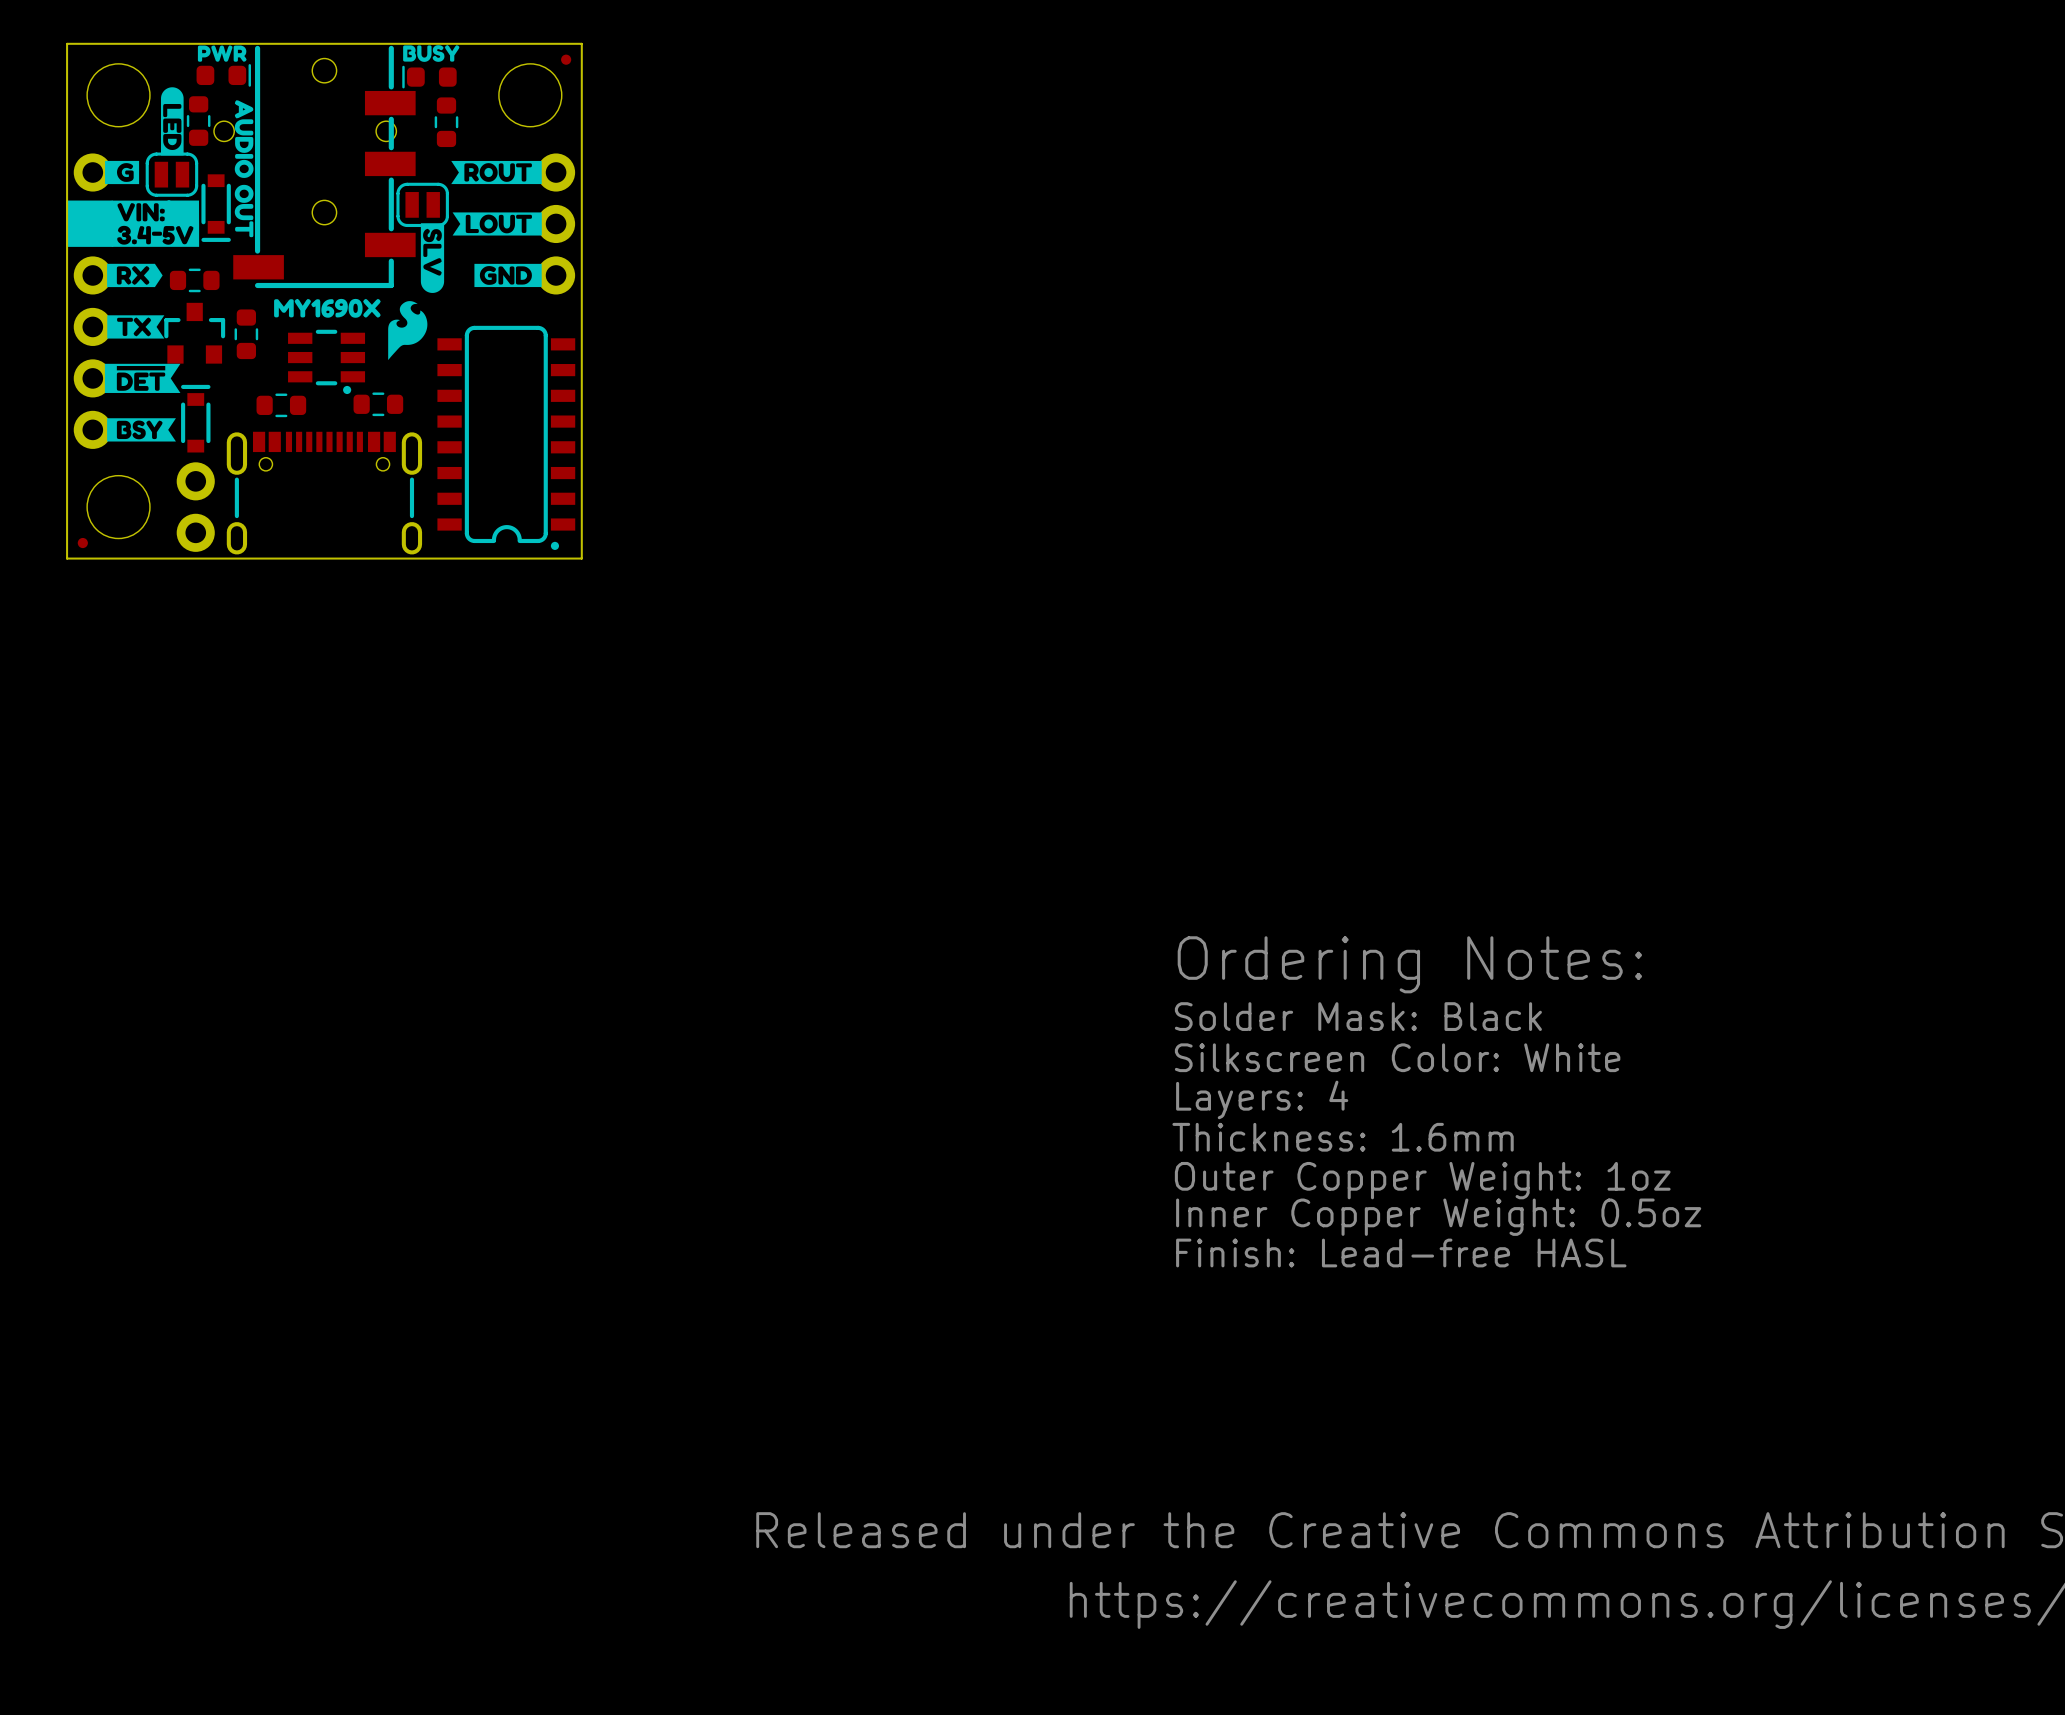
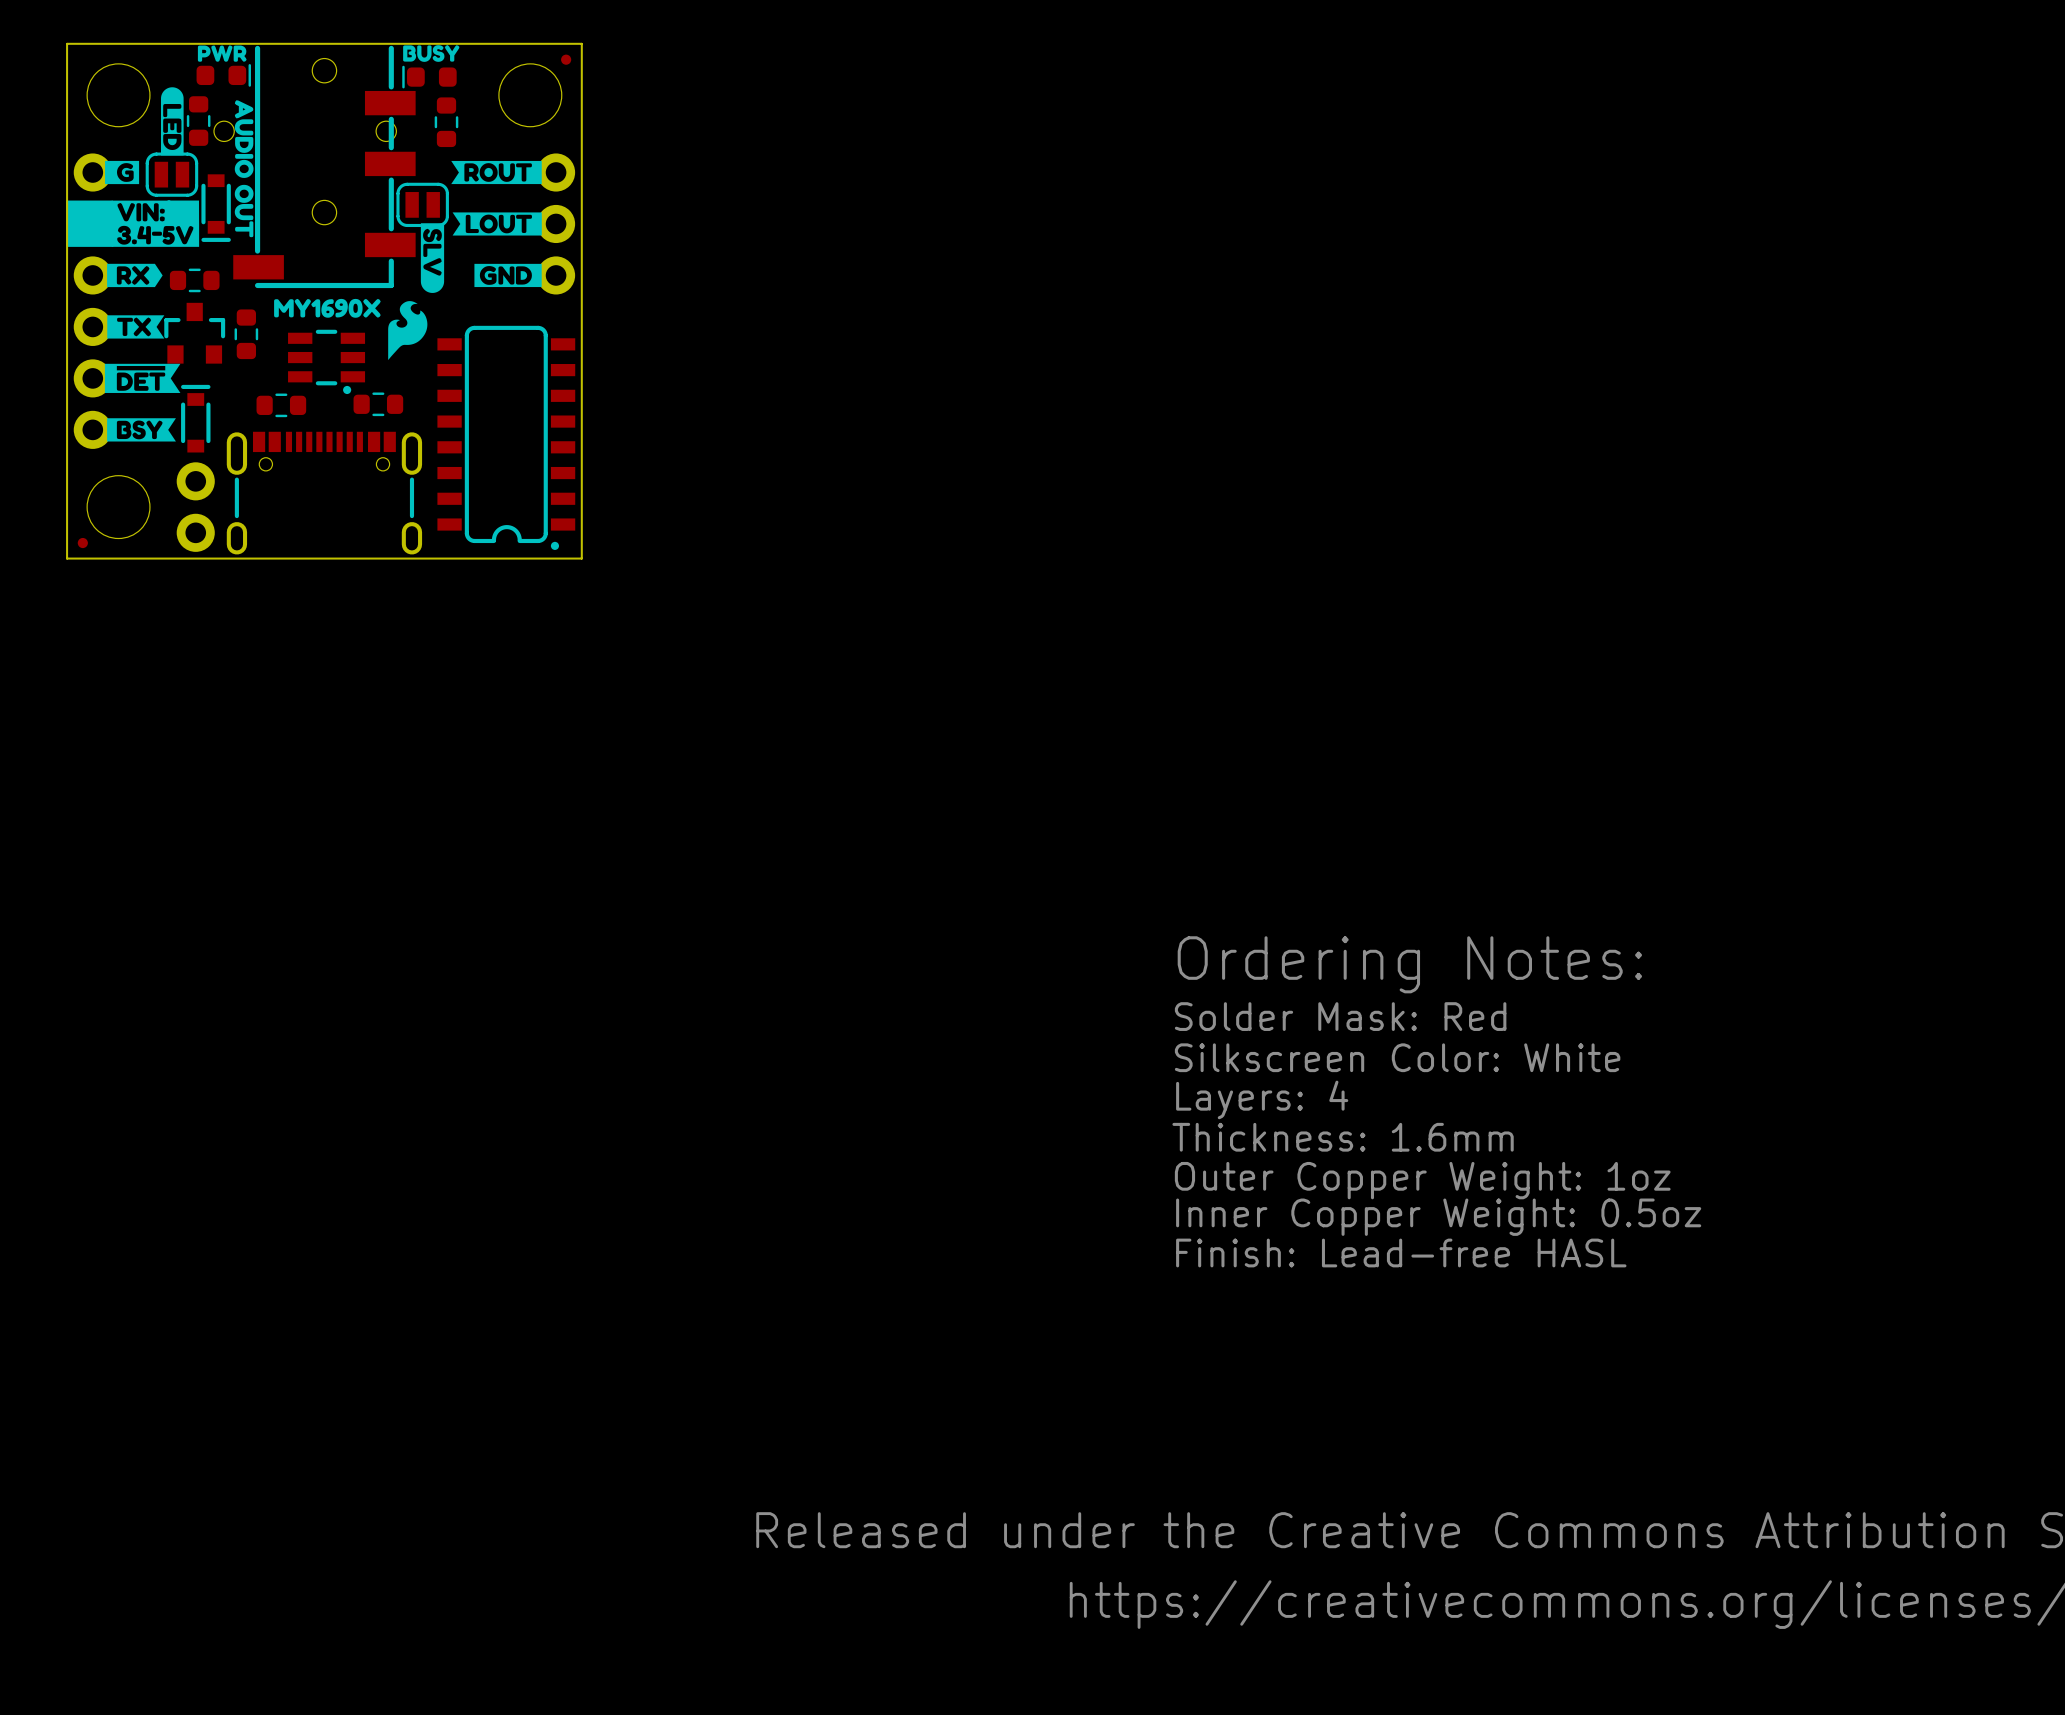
text: Solder Mask: Black (1358, 1016) -> Solder Mask: Red (1340, 1016)

